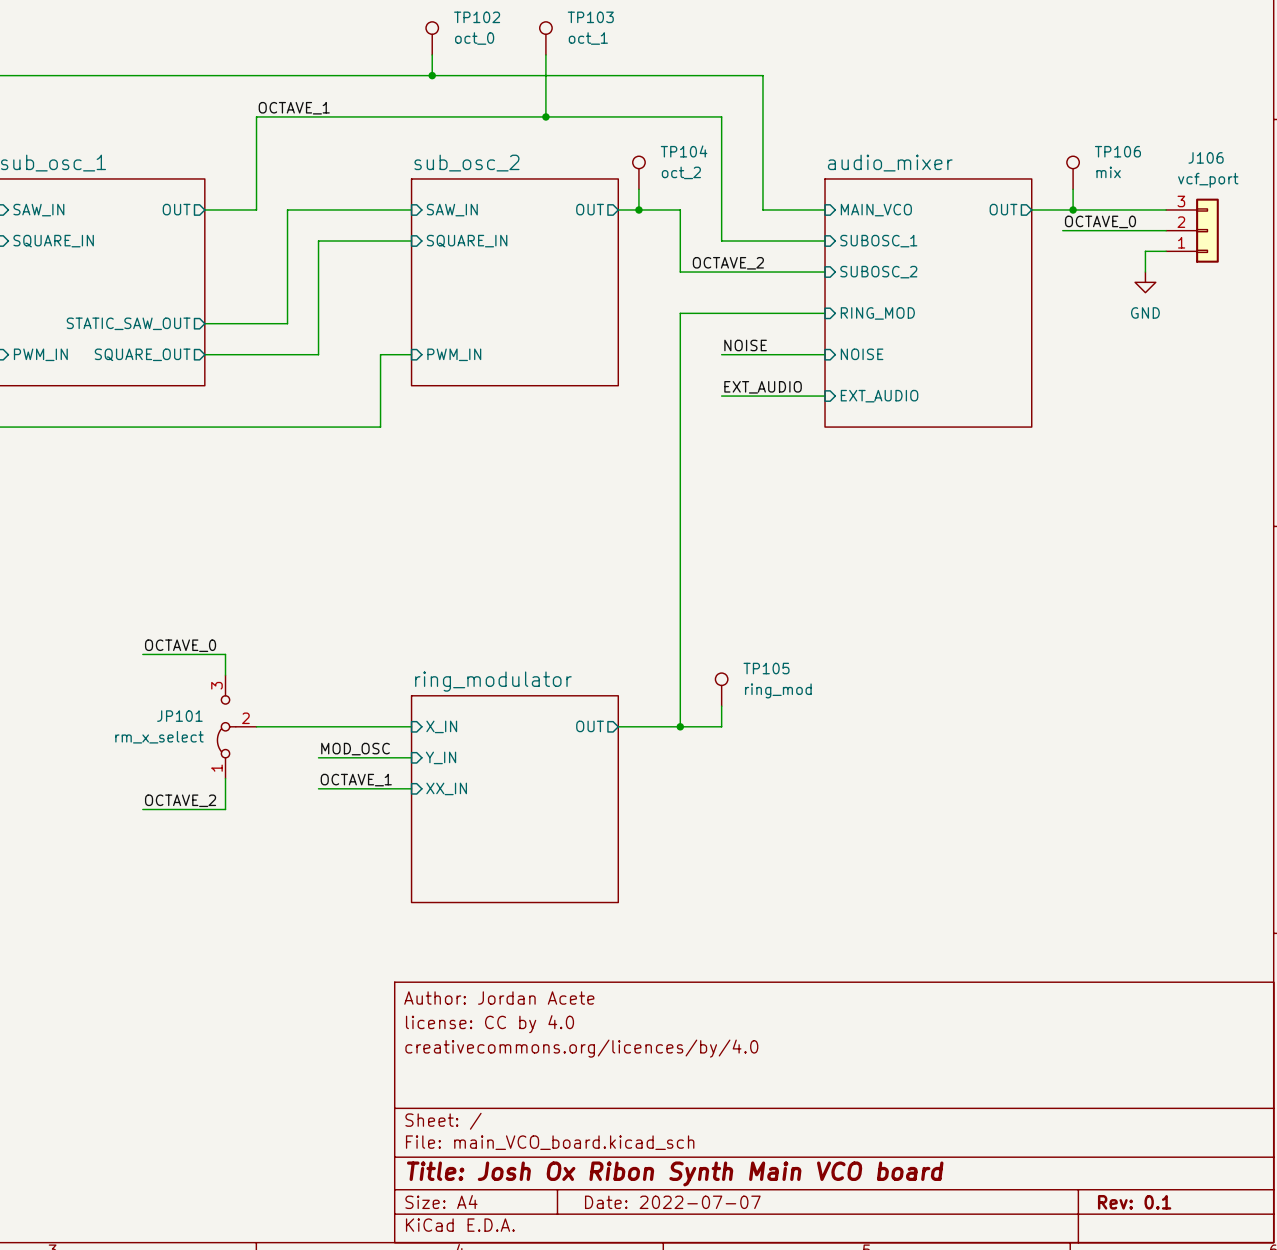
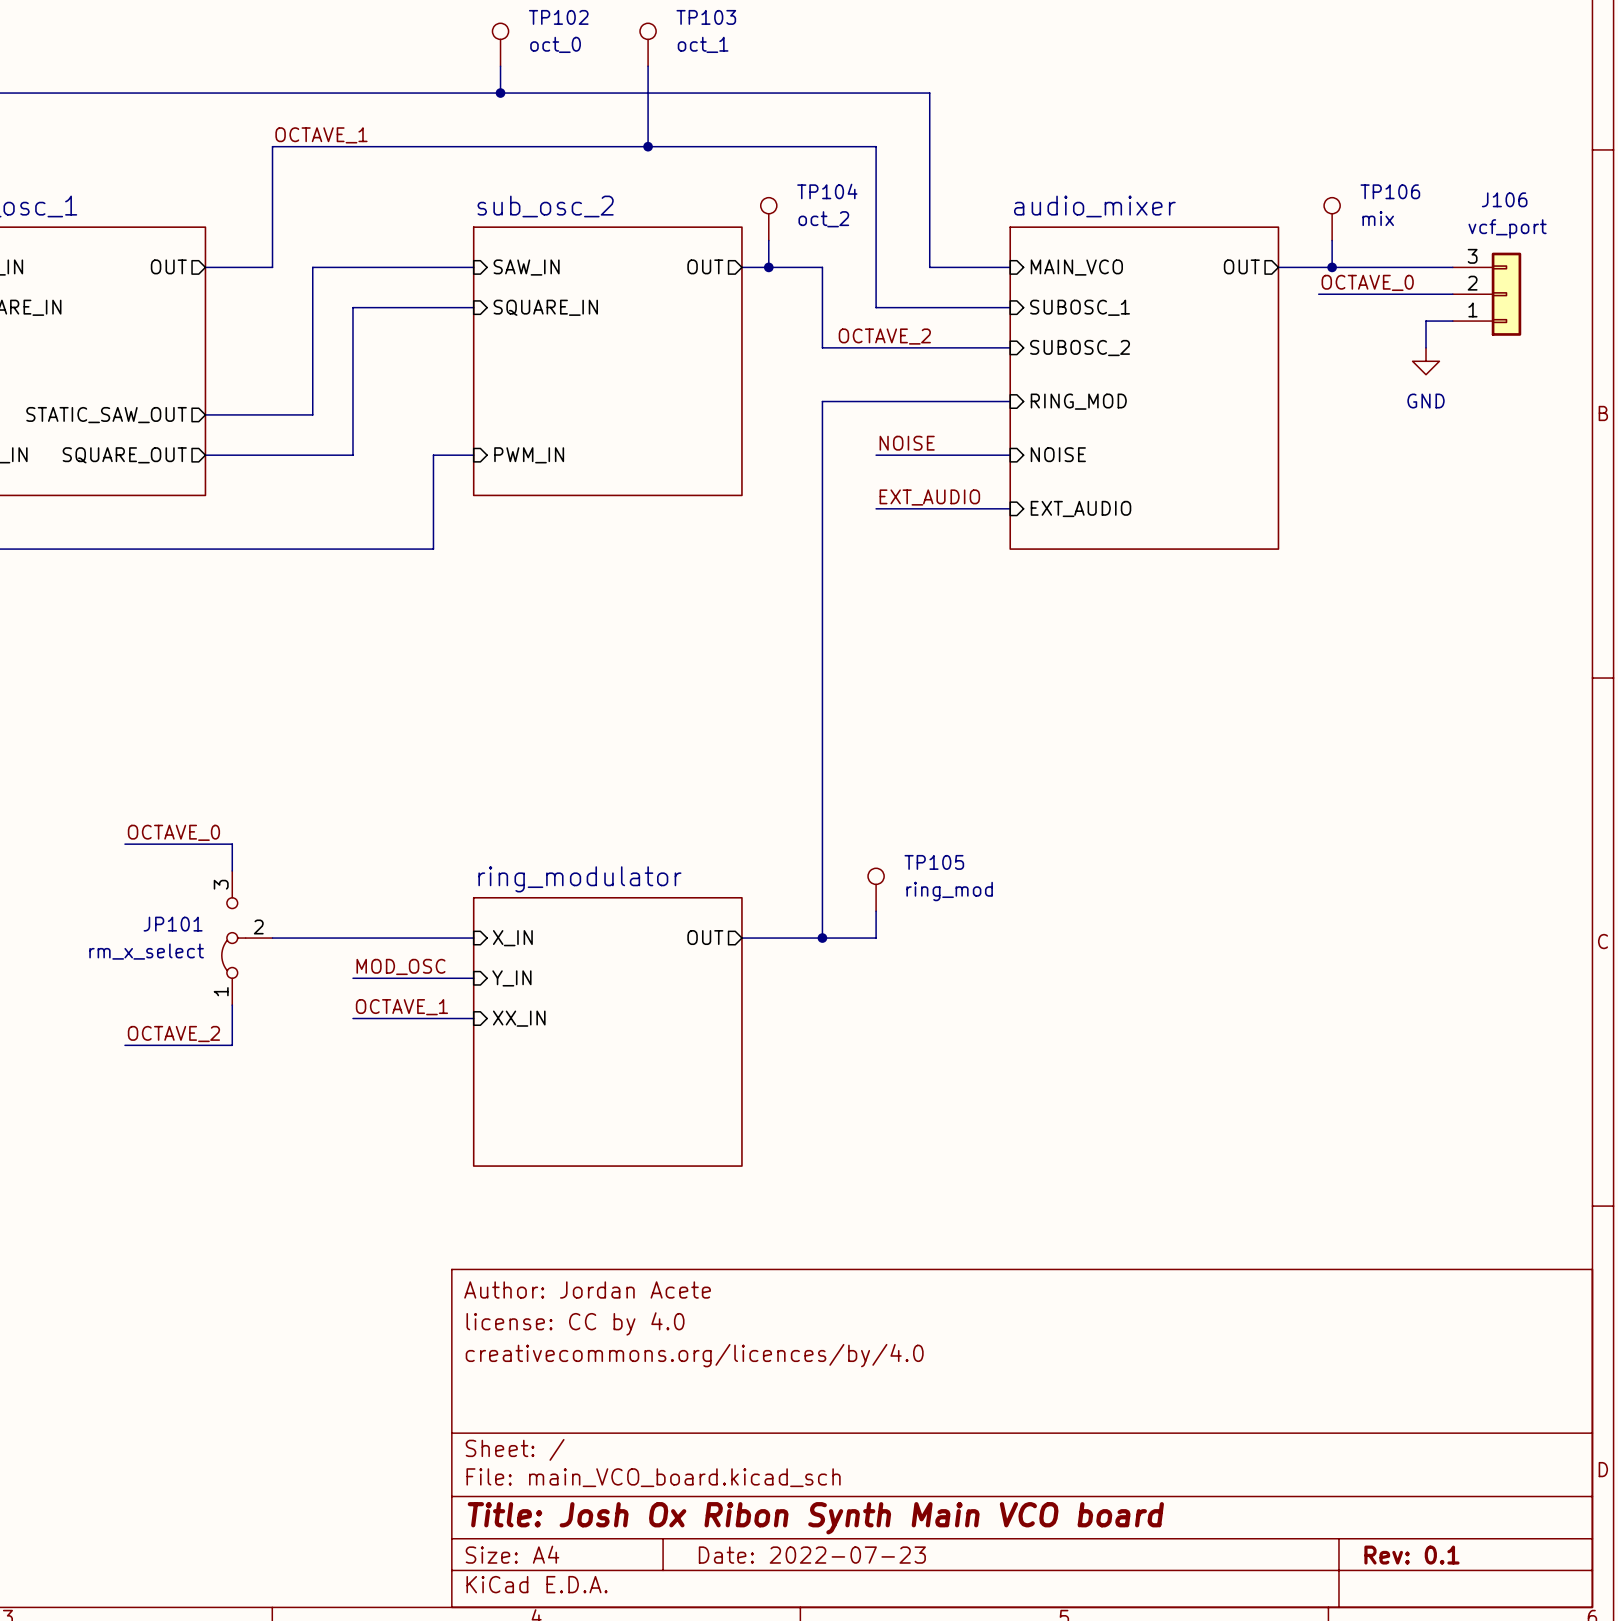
title block: Date: 2022-07-07 (672, 1202) -> Date: 2022-07-23 (812, 1555)

